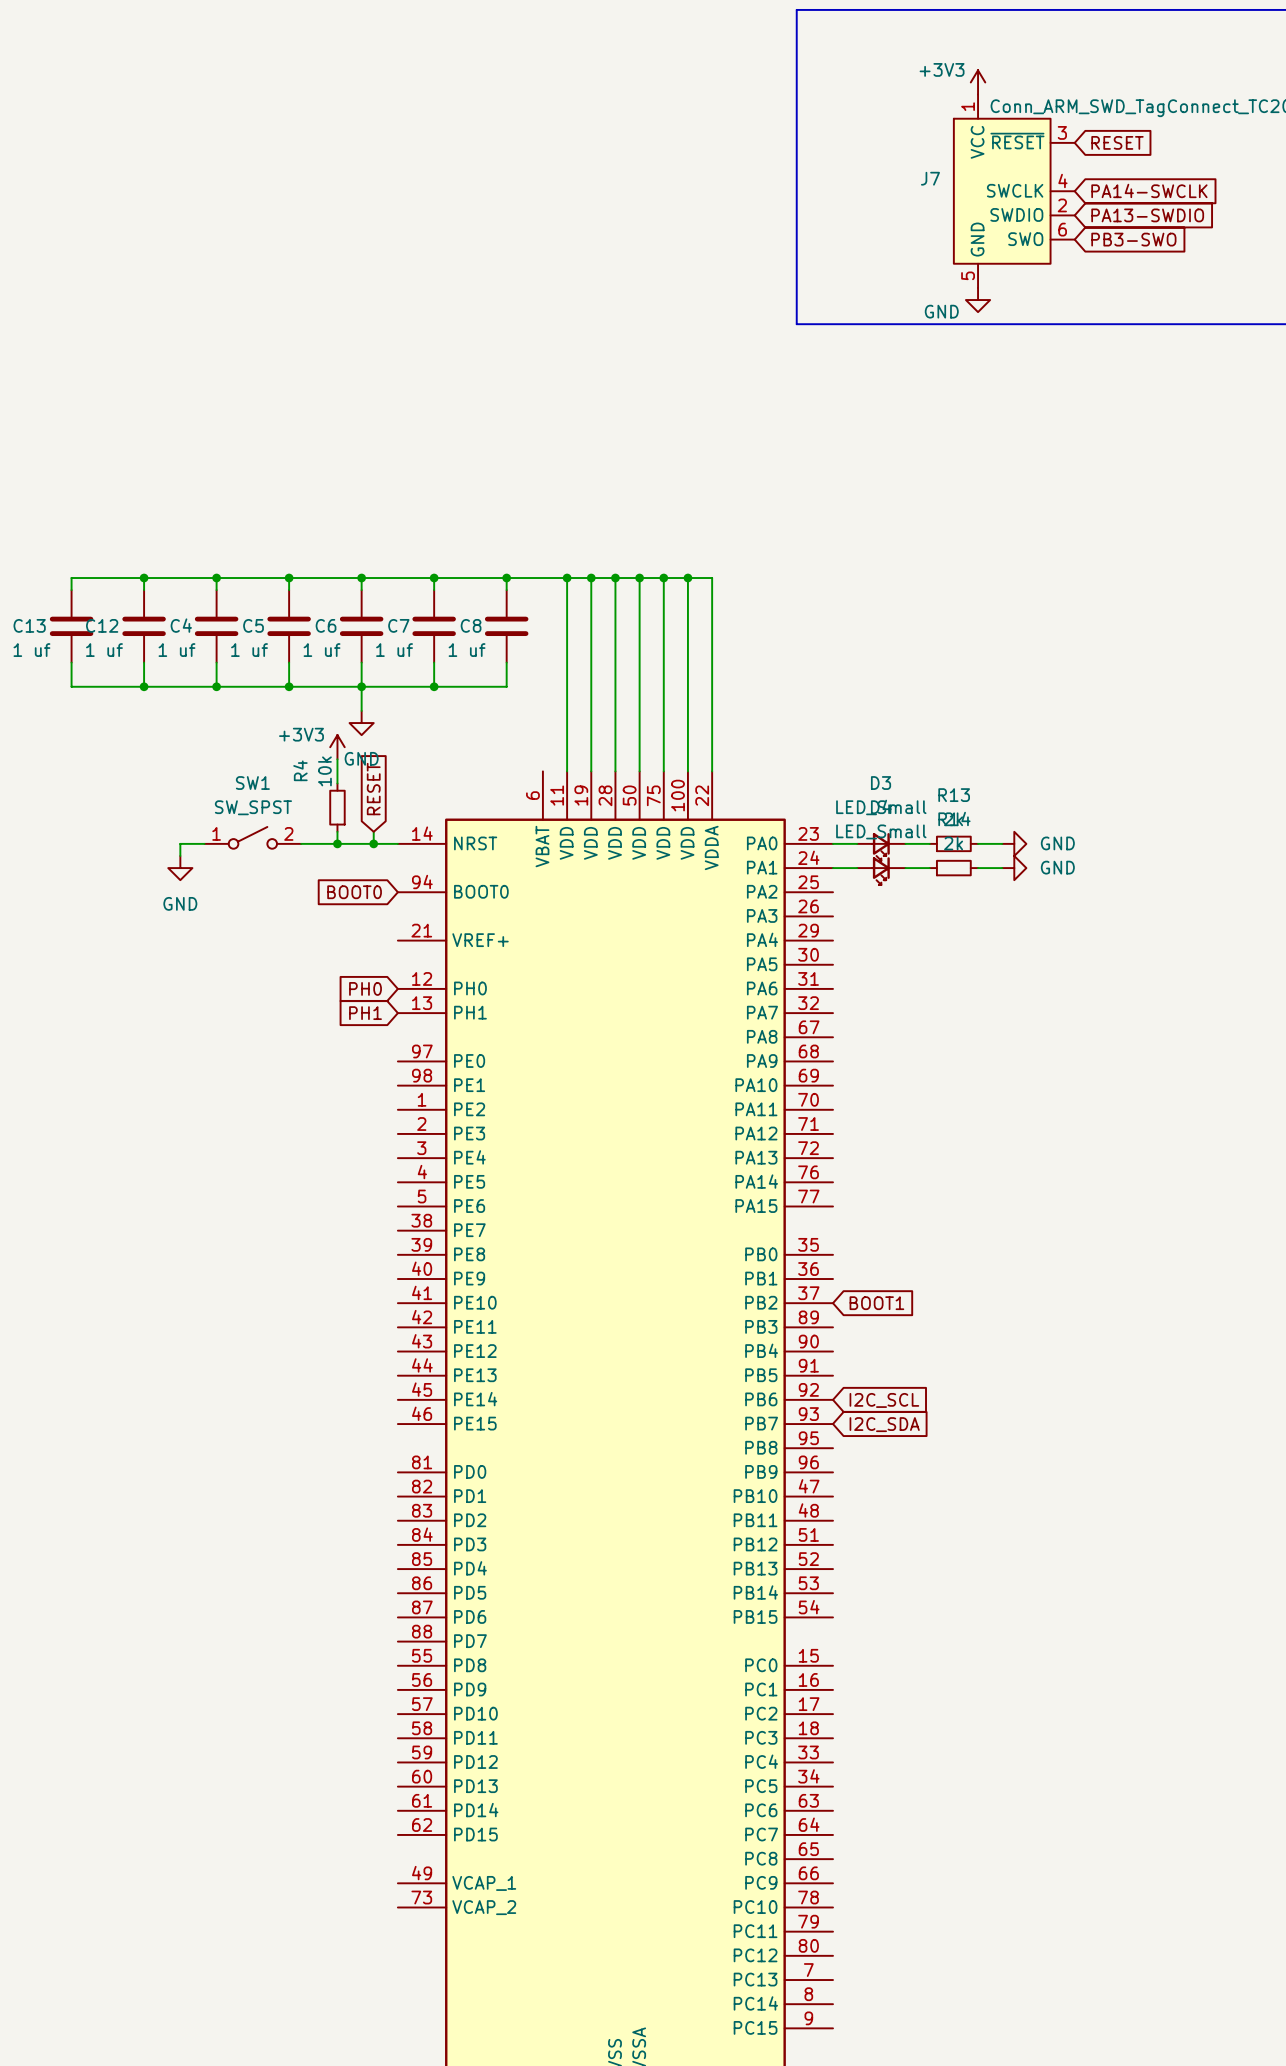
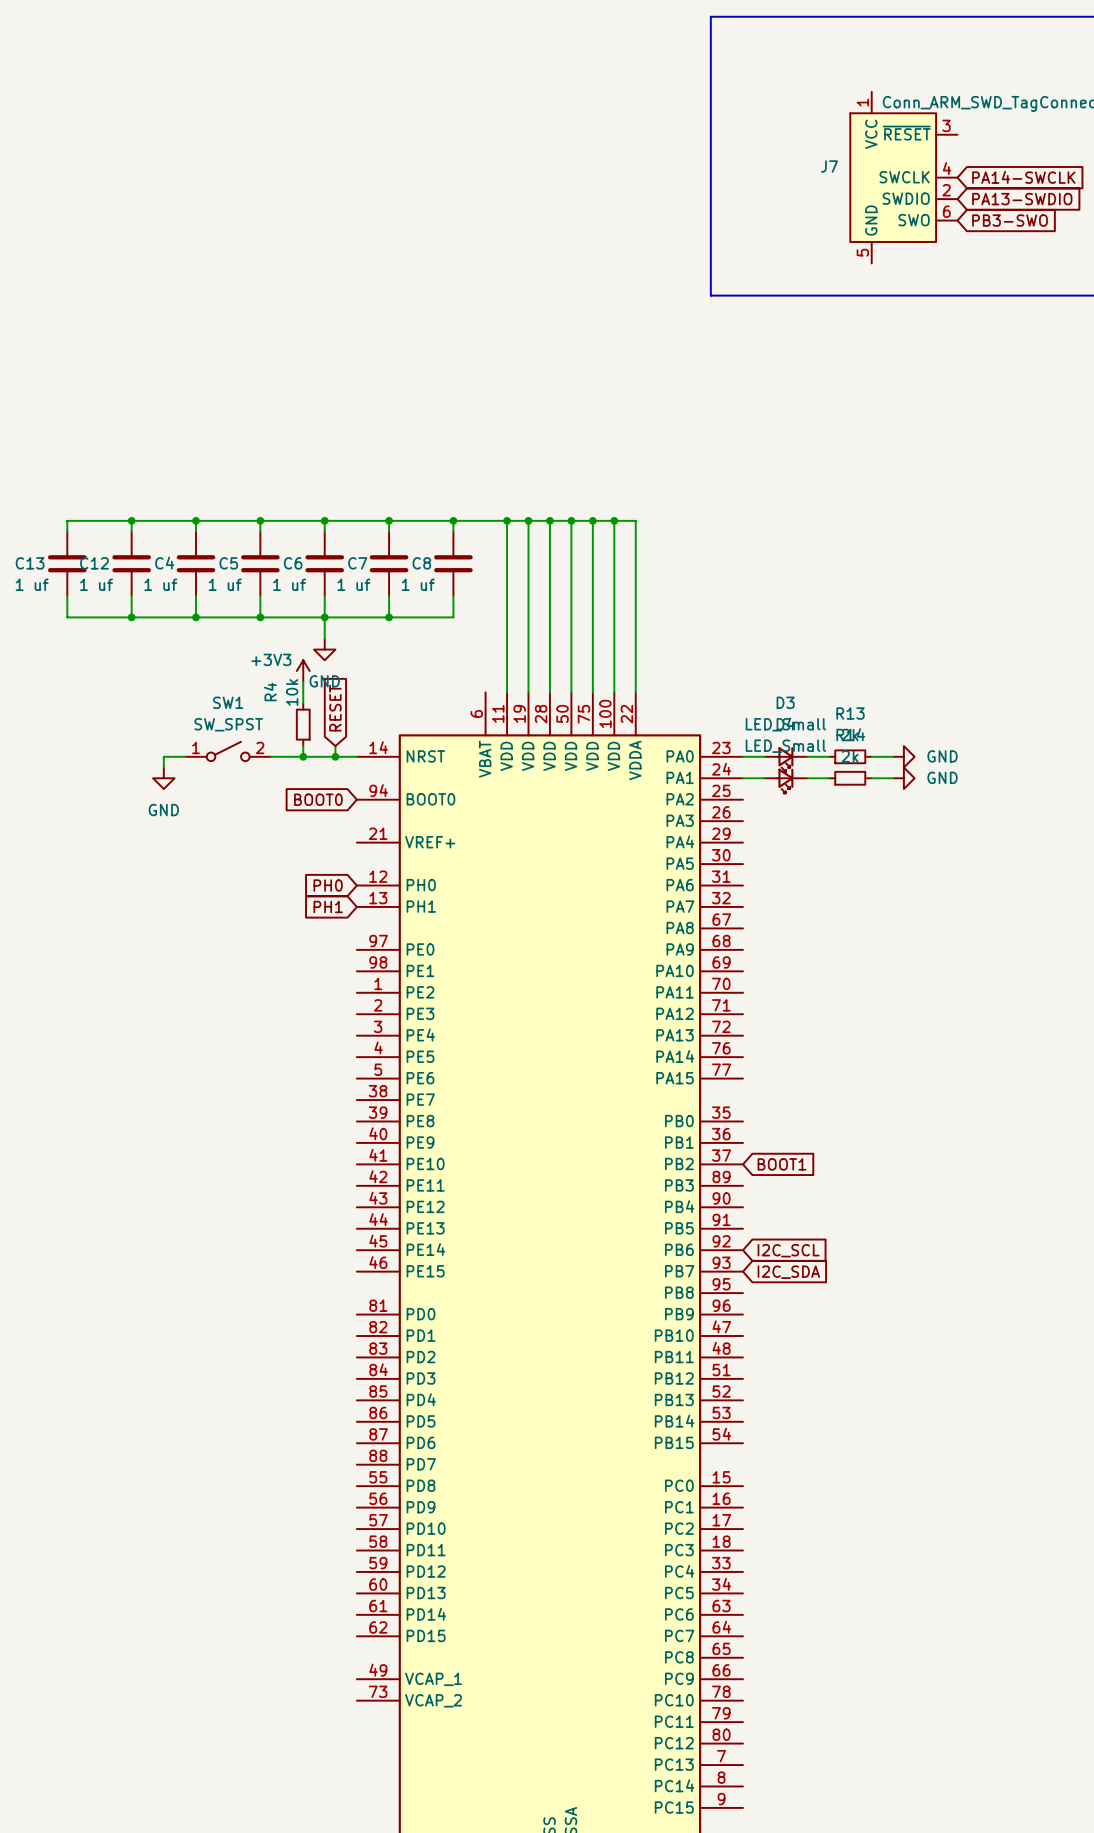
power symbol: +3V3 (978, 82) -> none
global label: RESET (1117, 142) -> none
power symbol: GND (978, 300) -> none

